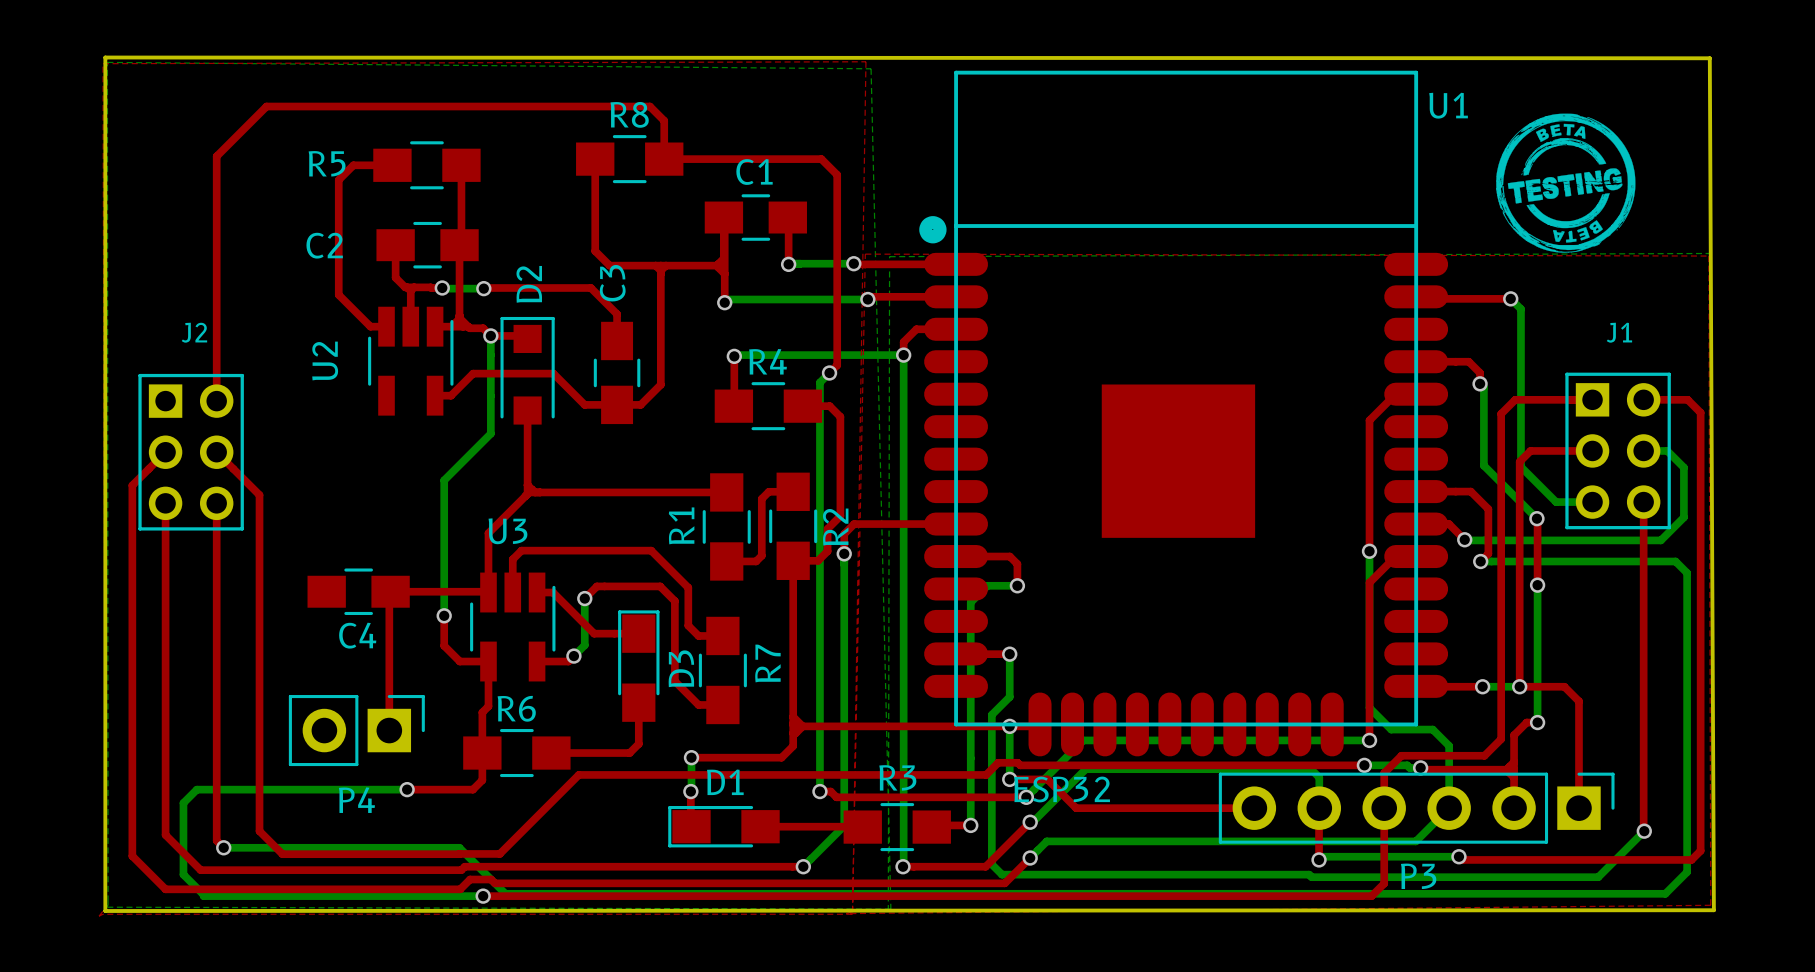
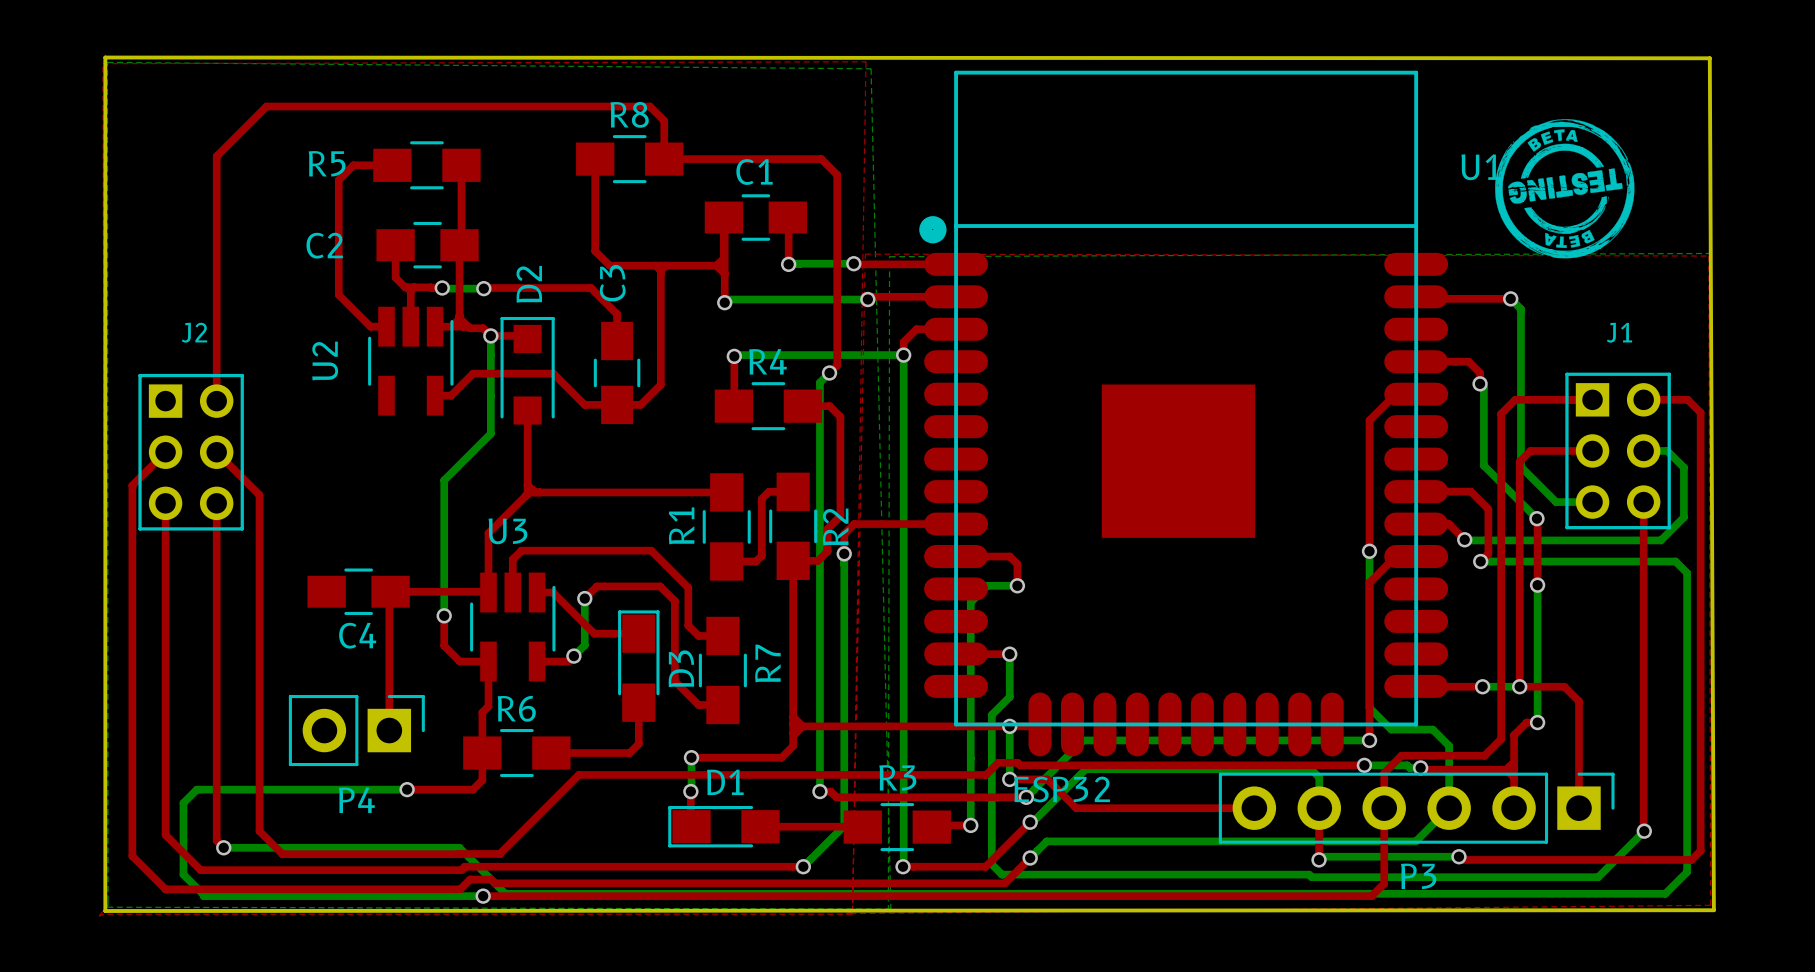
U1 name position: U1 (1448, 105) -> U1 (1480, 167)
drawing shape: [1496, 113, 1636, 253] -> [1495, 119, 1635, 259]

